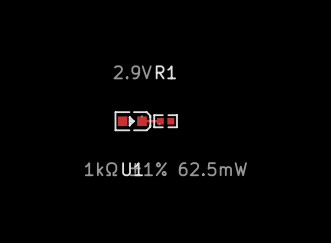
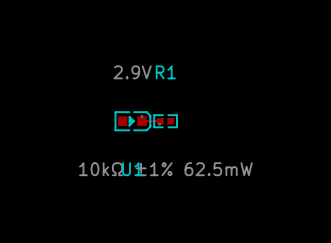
R1 value: 1kΩ ±1% 62.5mW (165, 169) -> 10kΩ ±1% 62.5mW (165, 169)

